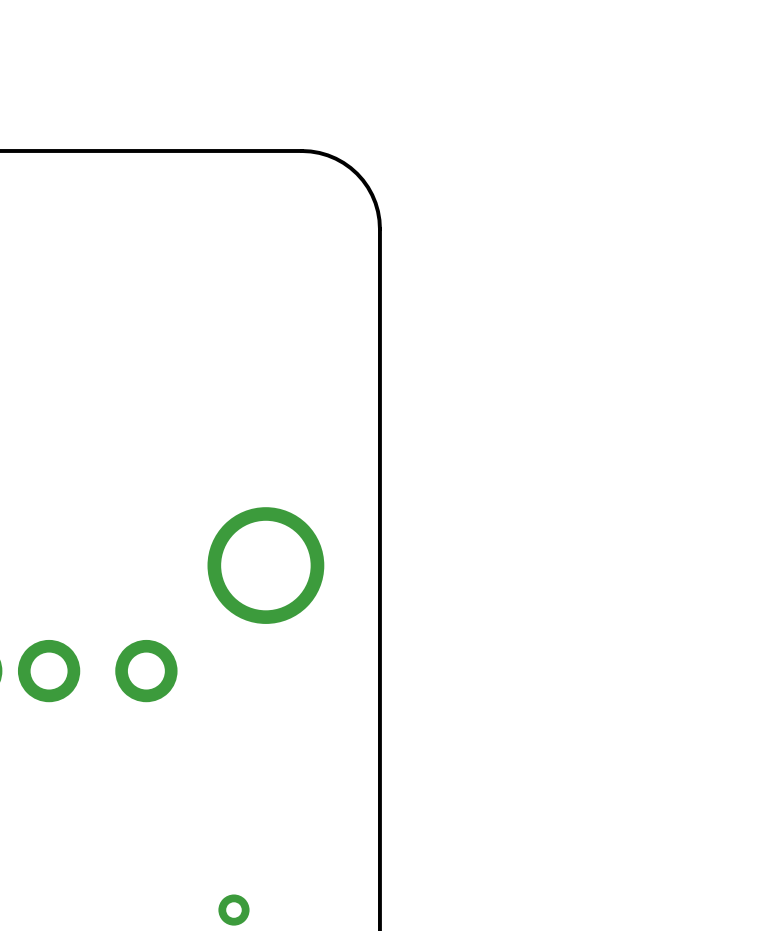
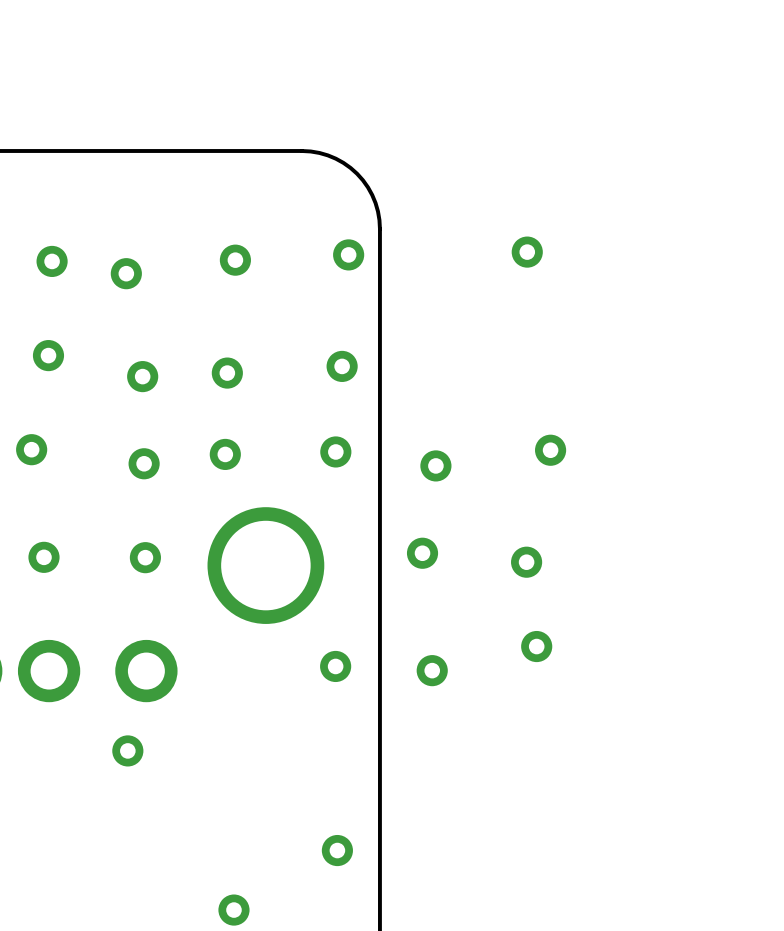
via: none -> (527, 252)
via: none -> (348, 254)
via: none -> (235, 260)
via: none -> (52, 261)
via: none -> (126, 273)
via: none -> (48, 355)
via: none -> (342, 366)
via: none -> (227, 373)
via: none -> (142, 376)
via: none -> (31, 449)
via: none -> (550, 450)
via: none -> (335, 451)
via: none -> (225, 454)
via: none -> (144, 463)
via: none -> (435, 465)
via: none -> (422, 553)
via: none -> (43, 557)
via: none -> (145, 557)
via: none -> (526, 562)
via: none -> (536, 646)
via: none -> (335, 666)
via: none -> (432, 670)
via: none -> (127, 750)
via: none -> (337, 850)

